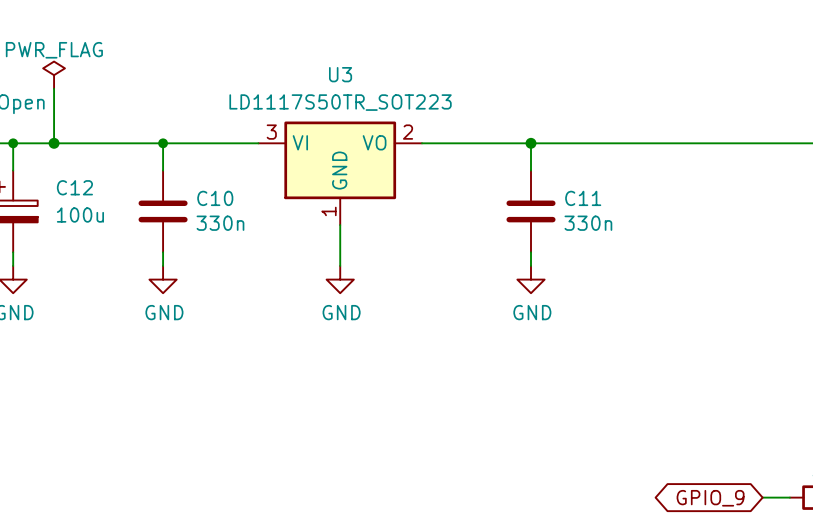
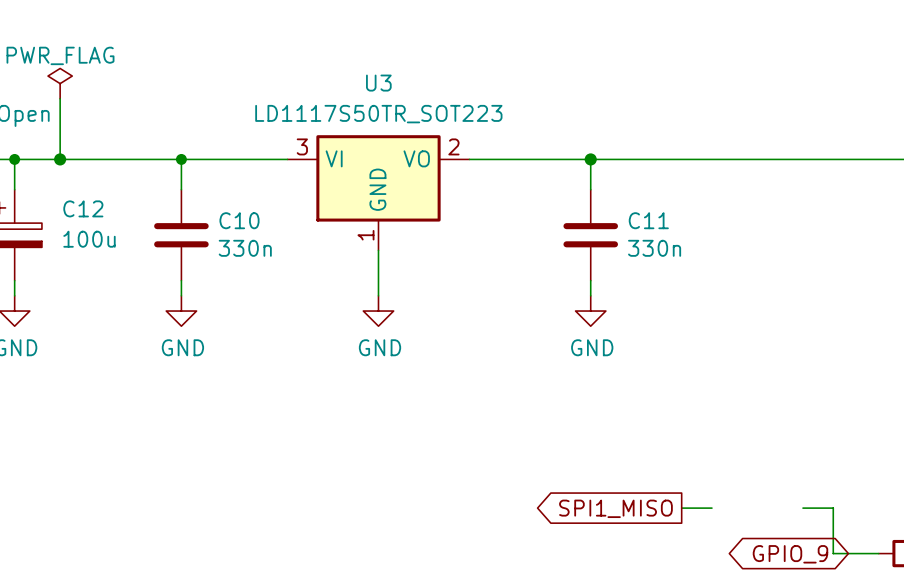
wire: none -> (681, 508) (712, 508)
wire: none -> (802, 508) (833, 508) (833, 553) (848, 553)
global label: none -> SPI1_MISO (615, 508)

